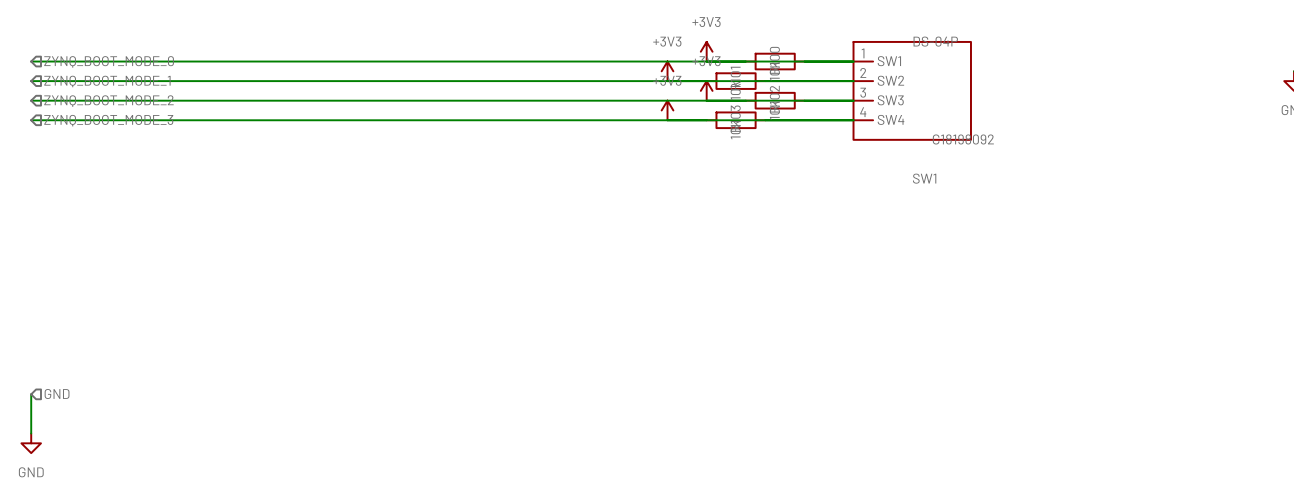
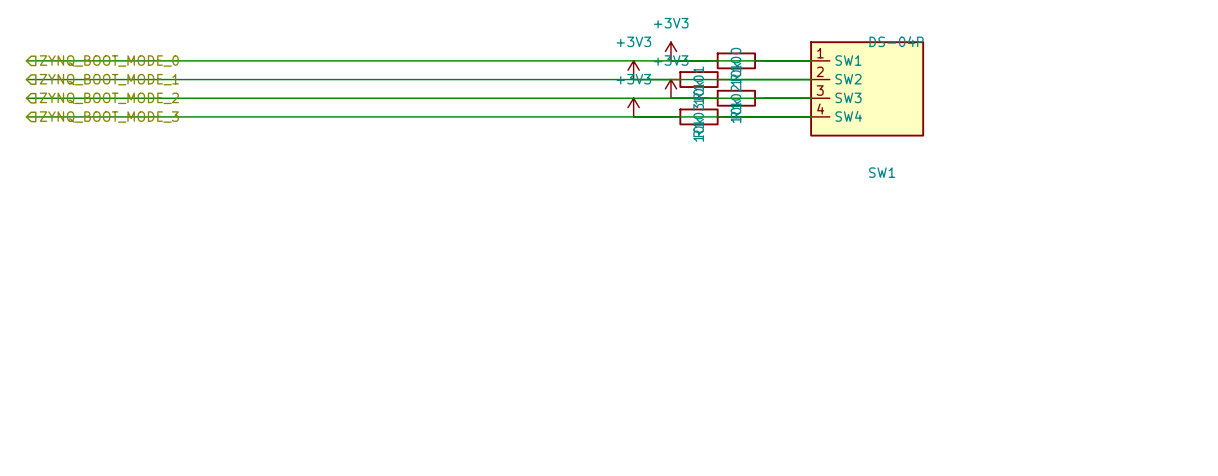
SW1 text: C18198092 (963, 139) -> none
wire: (31, 394) (31, 433) -> none
hierarchical label: GND (57, 394) -> none
power symbol: GND (31, 443) -> none

